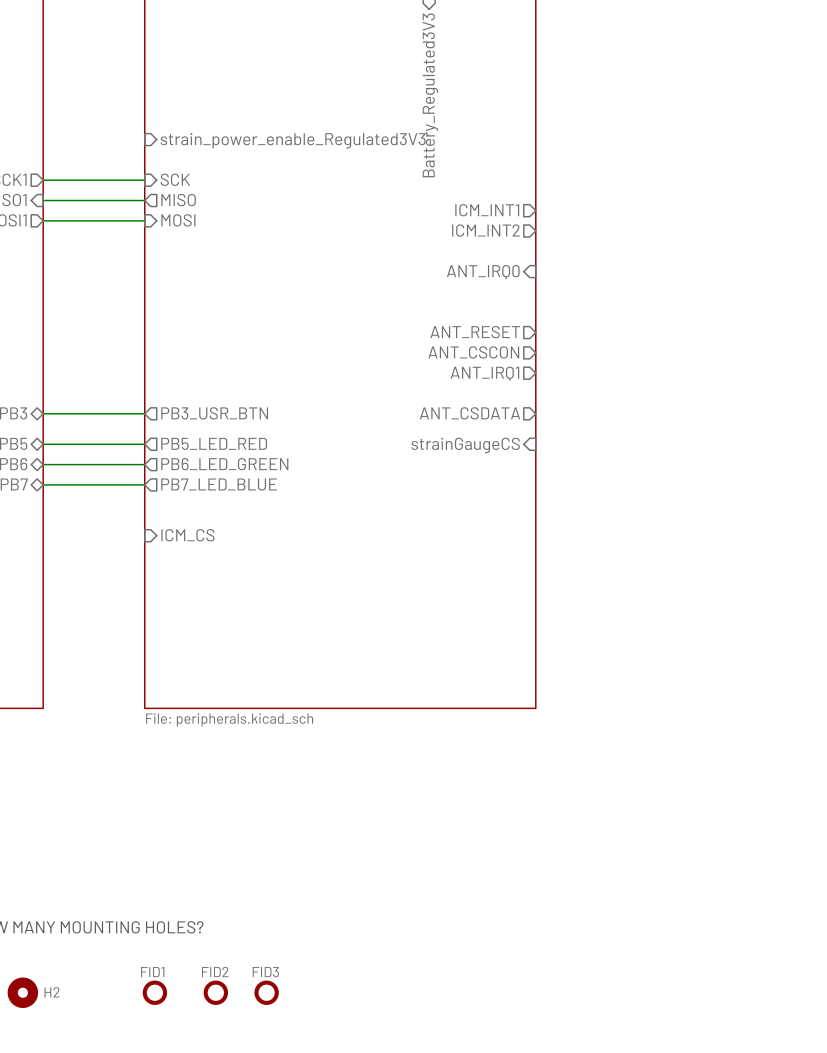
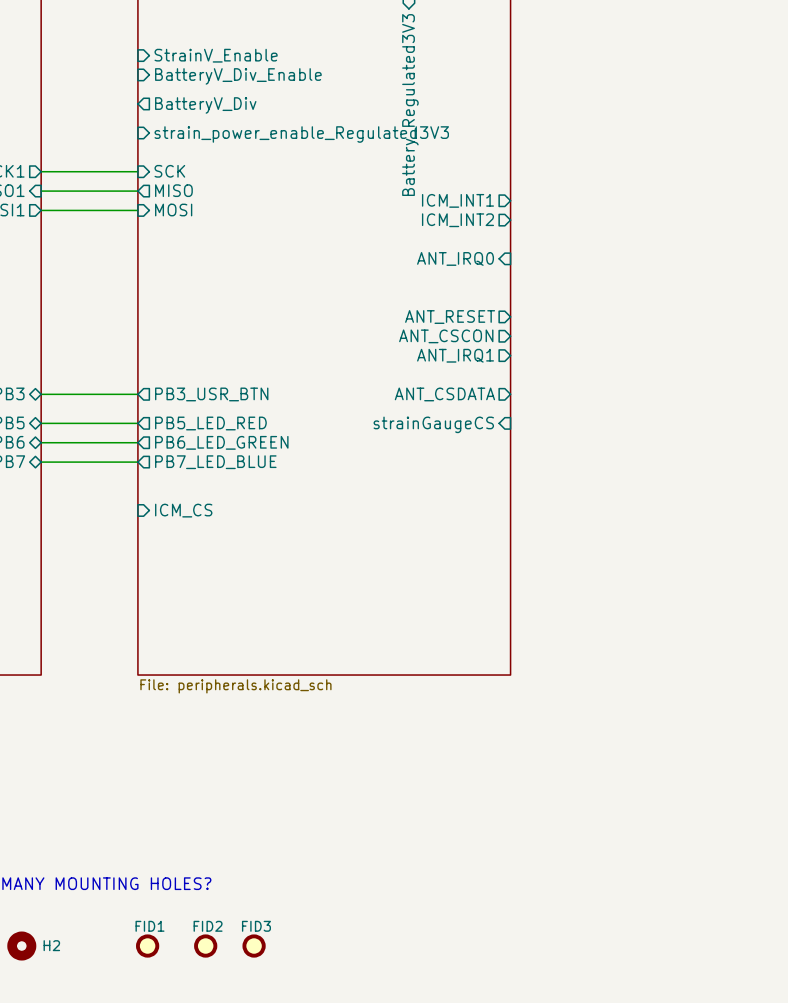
sheet pin: none -> StrainV_Enable (216, 55)
sheet pin: none -> BatteryV_Div_Enable (238, 76)
sheet pin: none -> BatteryV_Div (205, 105)

